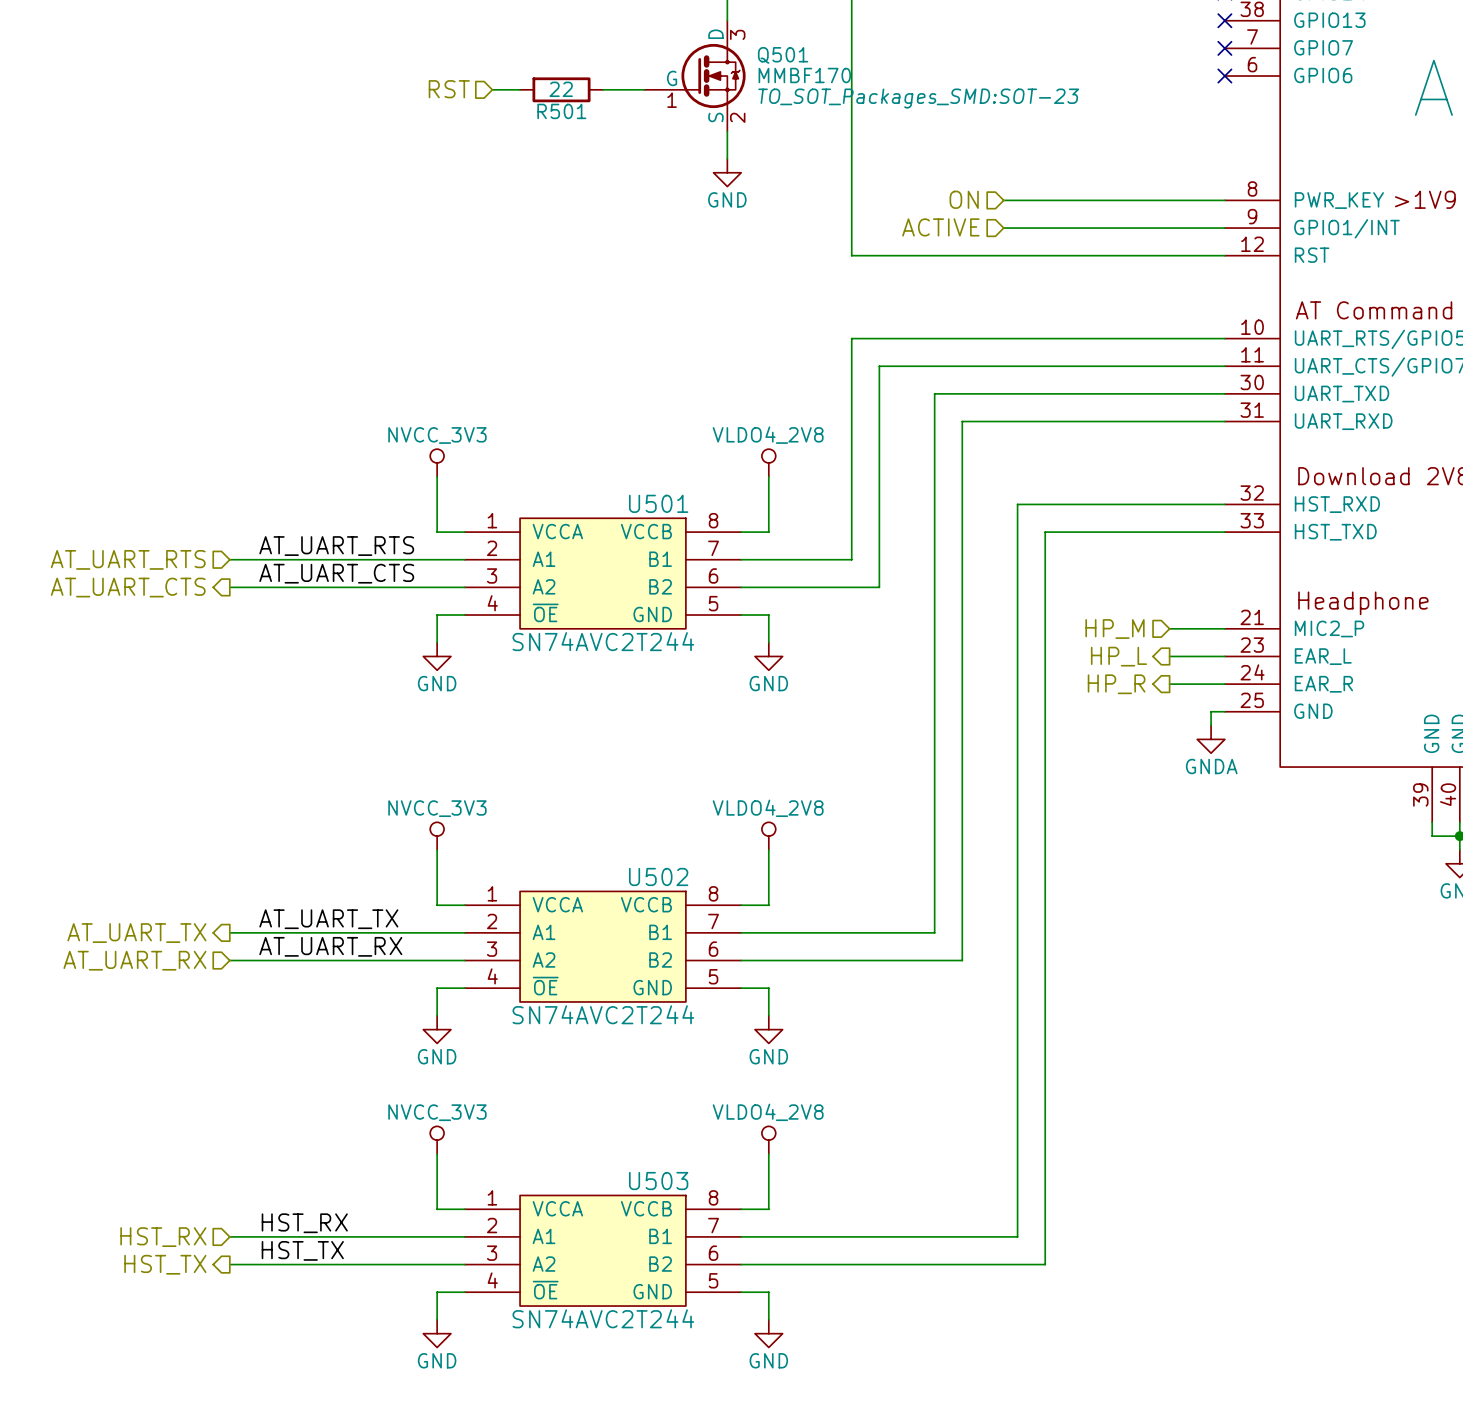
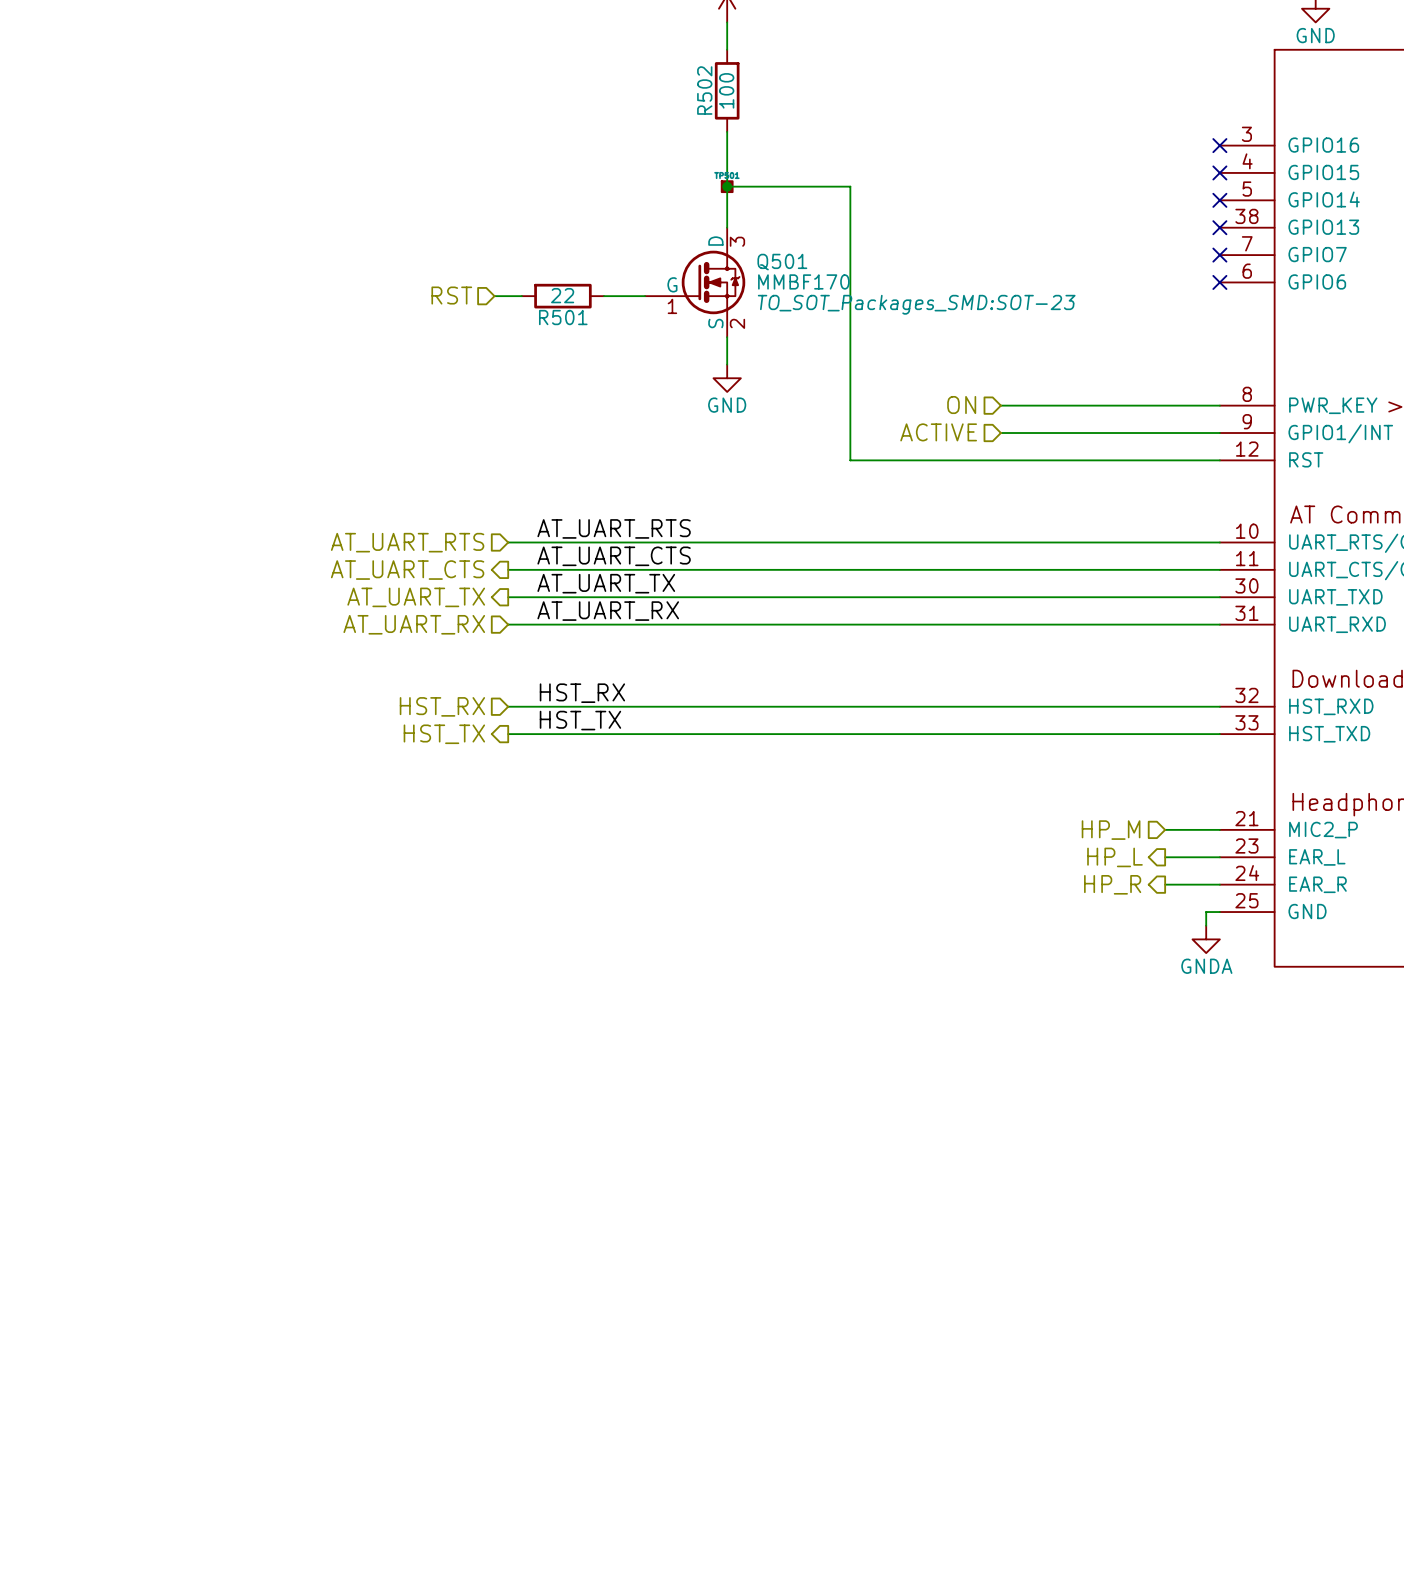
label: none -> AT_UART_RTS (614, 528)
hierarchical label: none -> AT_UART_RTS (407, 542)
wire: (851, 338) (851, 559) (741, 559) -> (850, 542) (508, 542)
label: none -> AT_UART_CTS (614, 556)
hierarchical label: none -> AT_UART_CTS (407, 570)
wire: (879, 366) (879, 587) (741, 587) -> (877, 569) (508, 569)
label: none -> AT_UART_TX (606, 583)
wire: (934, 393) (934, 932) (741, 932) -> (932, 597) (508, 597)
hierarchical label: none -> AT_UART_TX (416, 597)
label: none -> AT_UART_RX (608, 611)
hierarchical label: none -> AT_UART_RX (414, 624)
wire: (962, 421) (962, 960) (741, 960) -> (959, 624) (508, 624)
power symbol: NVCC_3V3 (437, 462) -> none
power symbol: VLDO4_2V8 (768, 462) -> none
wire: (437, 476) (437, 532) (464, 532) -> none
wire: (768, 476) (768, 532) -> (1041, 734) (768, 734)
label: none -> HST_RX (582, 693)
hierarchical label: none -> HST_RX (442, 706)
wire: (1017, 504) (1017, 1236) (741, 1236) -> (1014, 706) (508, 706)
label: none -> HST_TX (580, 720)
hierarchical label: none -> HST_TX (444, 734)
wire: (1045, 532) (1045, 1264) (741, 1264) -> none
label: AT_UART_RTS (336, 546) -> none
hierarchical label: AT_UART_RTS (128, 559) -> none
wire: (229, 559) (464, 559) -> none
label: AT_UART_CTS (336, 573) -> none
U501: SN74AVC2T244 (602, 573) -> none
hierarchical label: AT_UART_CTS (128, 587) -> none
wire: (229, 587) (464, 587) -> none
wire: (464, 615) (437, 615) (437, 642) -> none
wire: (741, 615) (768, 615) (768, 642) -> none
power symbol: GND (437, 656) -> none
power symbol: GND (768, 656) -> none
power symbol: NVCC_3V3 (437, 836) -> none
power symbol: VLDO4_2V8 (768, 836) -> none
wire: (437, 849) (437, 905) (464, 905) -> none
wire: (768, 849) (768, 905) (741, 905) -> none
label: AT_UART_TX (328, 919) -> none
wire: (229, 932) (464, 932) -> none
hierarchical label: AT_UART_TX (136, 933) -> none
label: AT_UART_RX (330, 946) -> none
U502: SN74AVC2T244 (602, 946) -> none
hierarchical label: AT_UART_RX (134, 960) -> none
wire: (229, 960) (464, 960) -> none
wire: (464, 988) (437, 988) (437, 1015) -> none
wire: (741, 988) (768, 988) (768, 1015) -> none
power symbol: GND (437, 1029) -> none
power symbol: GND (768, 1029) -> none
power symbol: NVCC_3V3 (437, 1140) -> none
power symbol: VLDO4_2V8 (768, 1140) -> none
wire: (437, 1154) (437, 1209) (464, 1209) -> none
wire: (768, 1154) (768, 1209) (741, 1209) -> none
label: HST_RX (304, 1223) -> none
wire: (229, 1236) (464, 1236) -> none
hierarchical label: HST_RX (163, 1237) -> none
label: HST_TX (302, 1250) -> none
U503: SN74AVC2T244 (602, 1250) -> none
hierarchical label: HST_TX (165, 1264) -> none
wire: (229, 1264) (464, 1264) -> none
wire: (464, 1292) (437, 1292) (437, 1319) -> none
wire: (741, 1292) (768, 1292) (768, 1319) -> none
power symbol: GND (437, 1333) -> none
power symbol: GND (768, 1333) -> none

